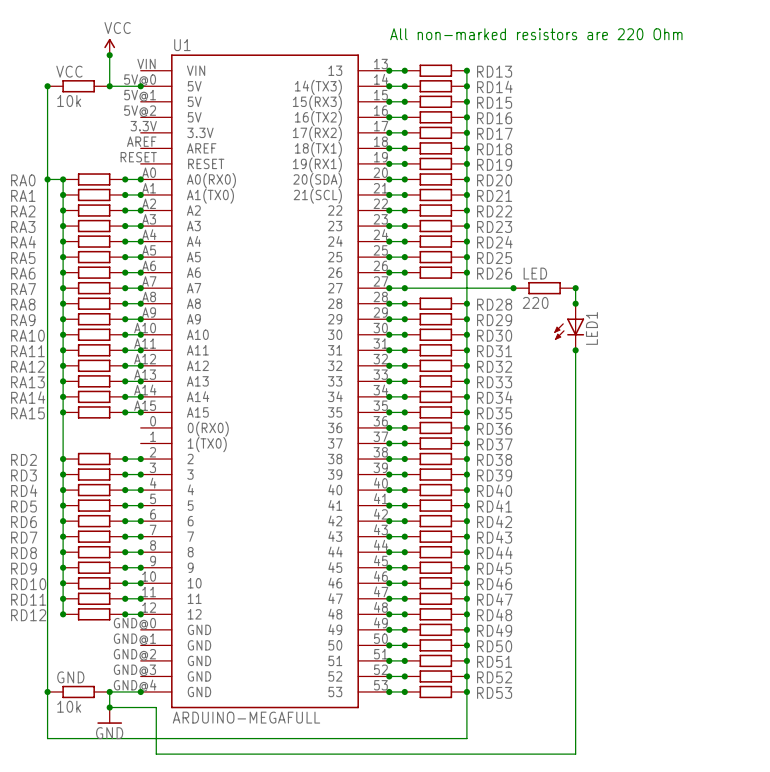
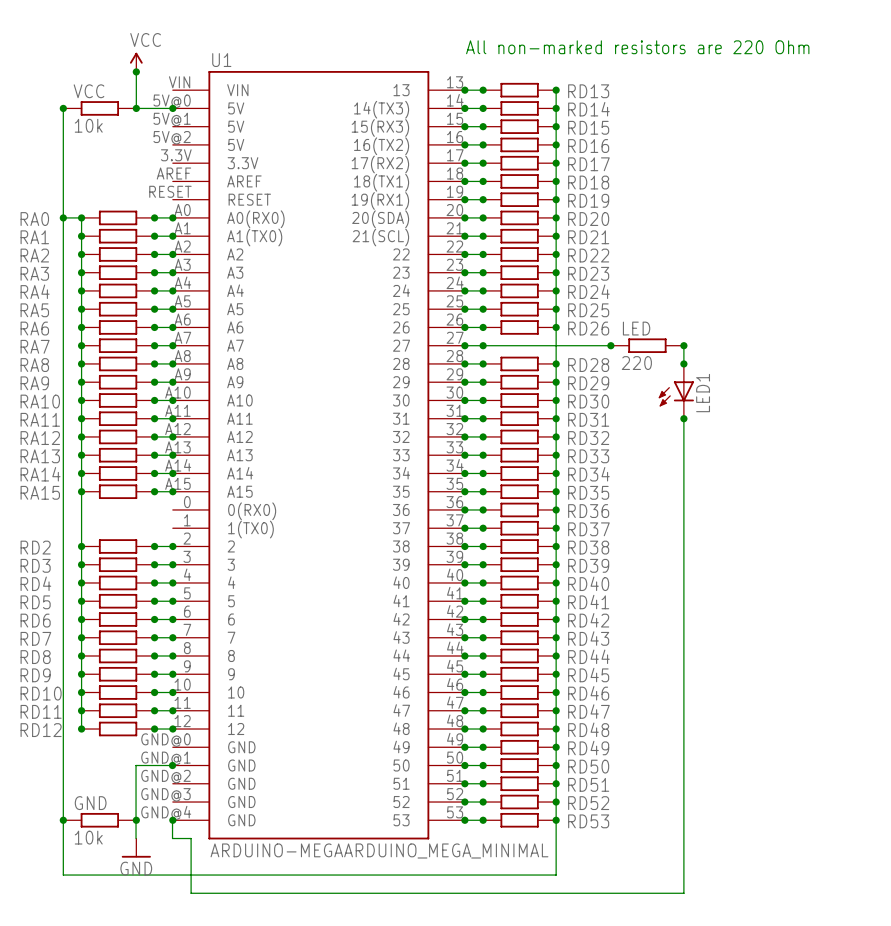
wire: none -> (172, 765) (136, 765) (136, 838)
junction: none -> (172, 765)
wire: (140, 691) (109, 691) (109, 707) (140, 707) -> (172, 820) (172, 838)
junction: (109, 707) -> none
U1 value: ARDUINO-MEGAFULL (246, 717) -> ARDUINO-MEGAARDUINO_MEGA_MINIMAL (379, 850)

